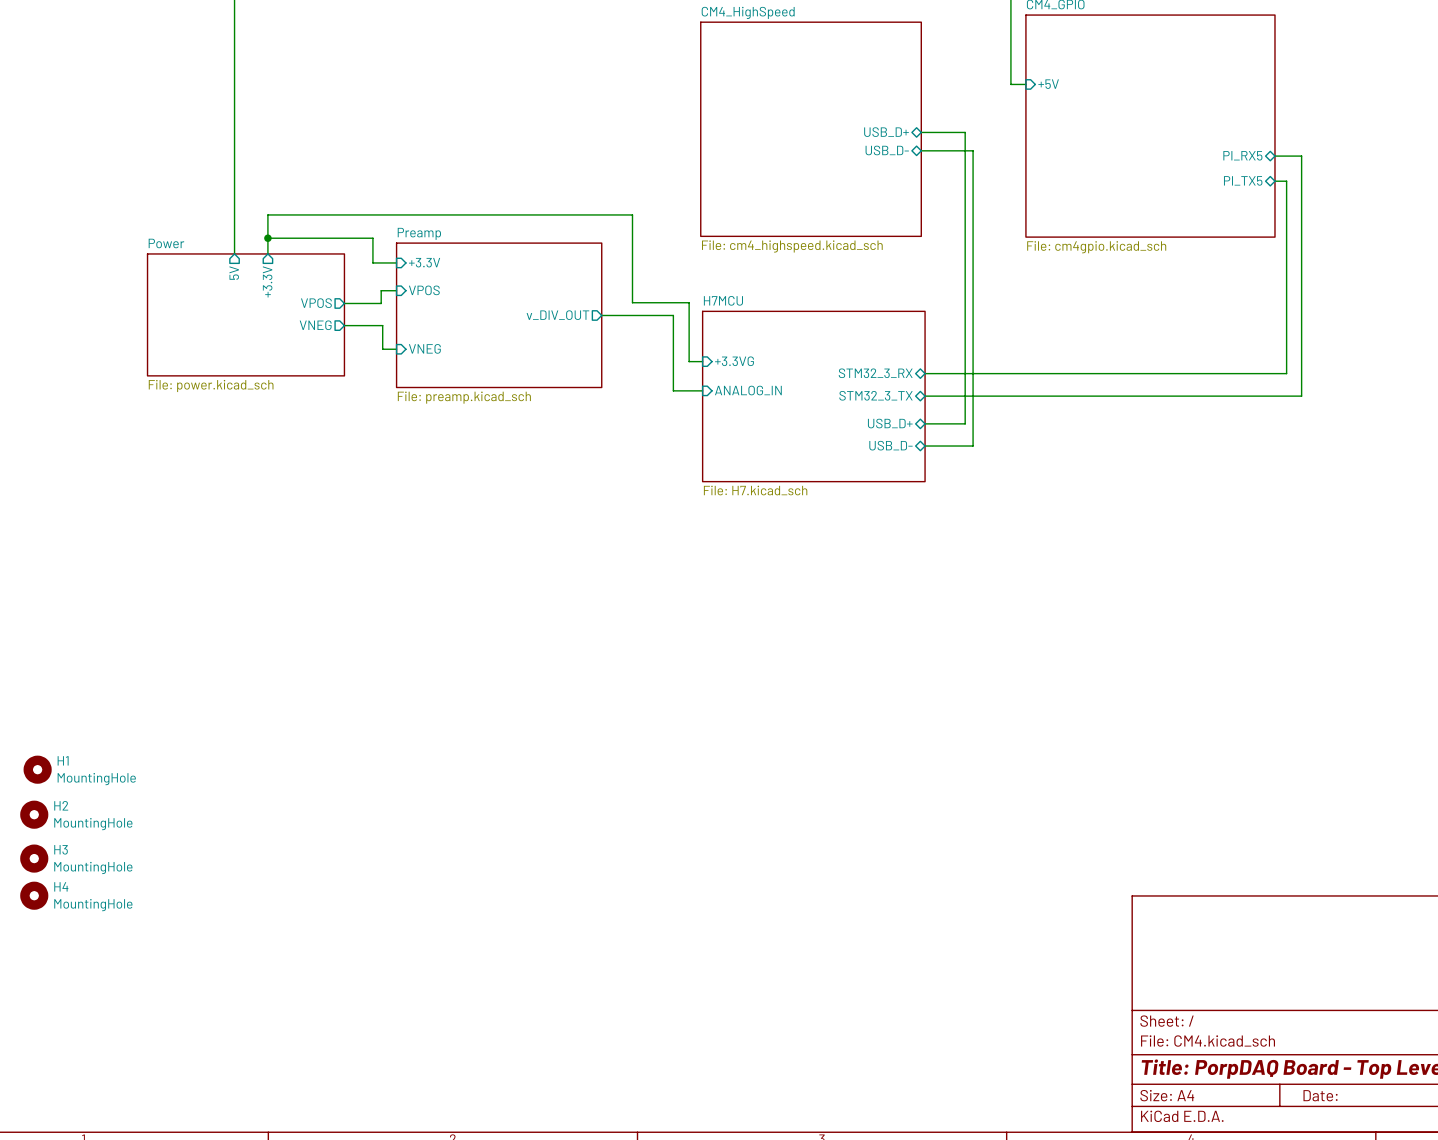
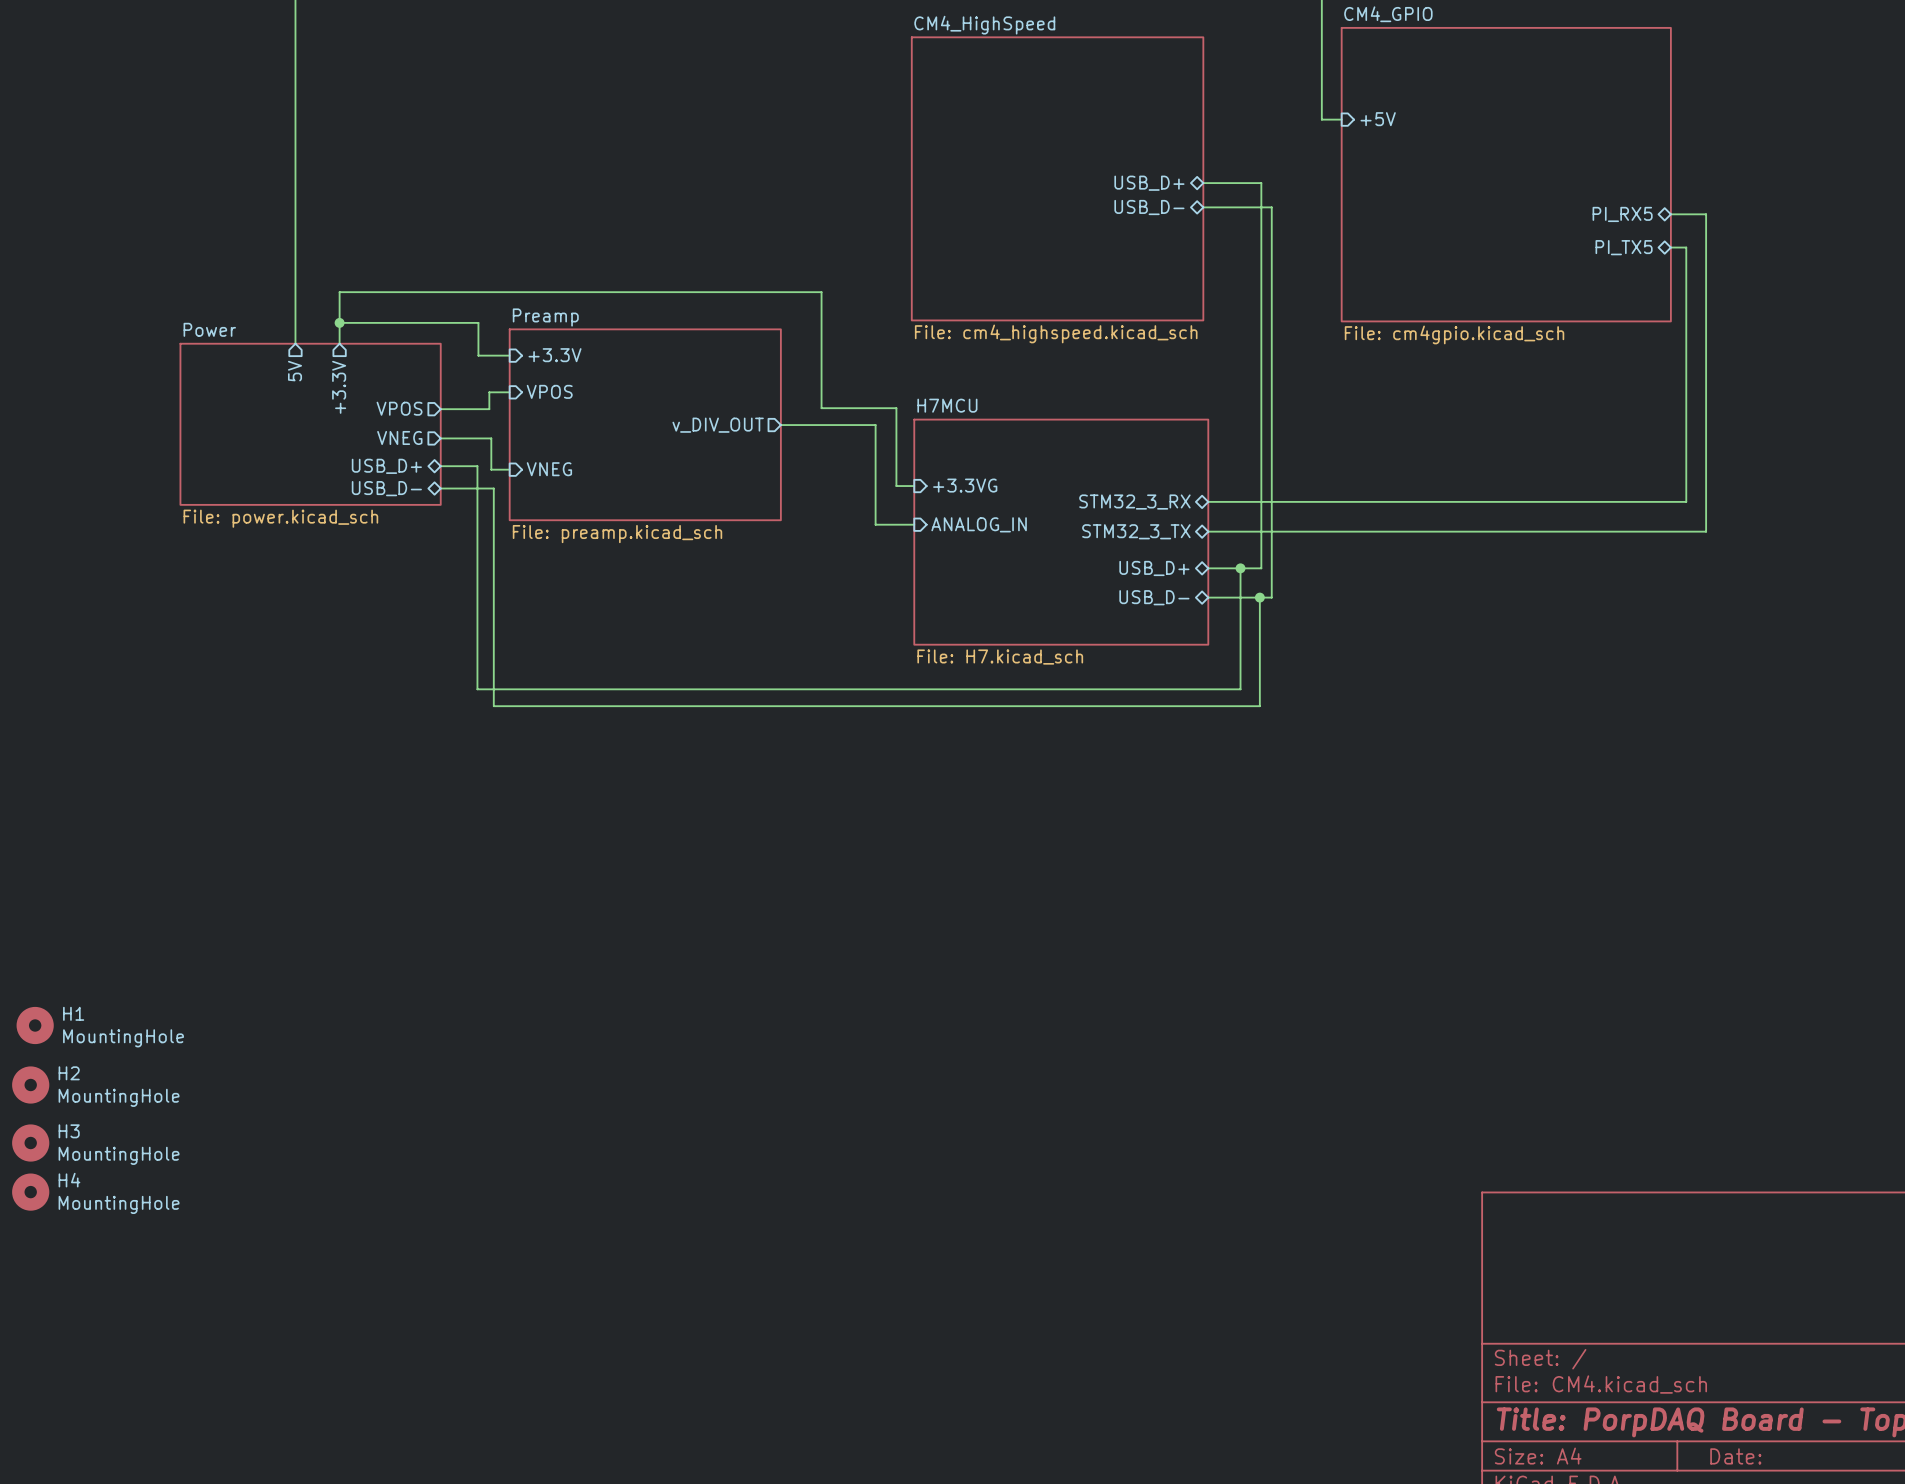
sheet pin: none -> USB_D+ (386, 466)
wire: none -> (440, 466) (477, 466) (477, 689) (1240, 689) (1240, 568)
sheet pin: none -> USB_D- (386, 488)
wire: none -> (440, 488) (493, 488) (493, 706) (1259, 706) (1259, 597)
junction: none -> (1240, 568)
junction: none -> (1259, 597)

